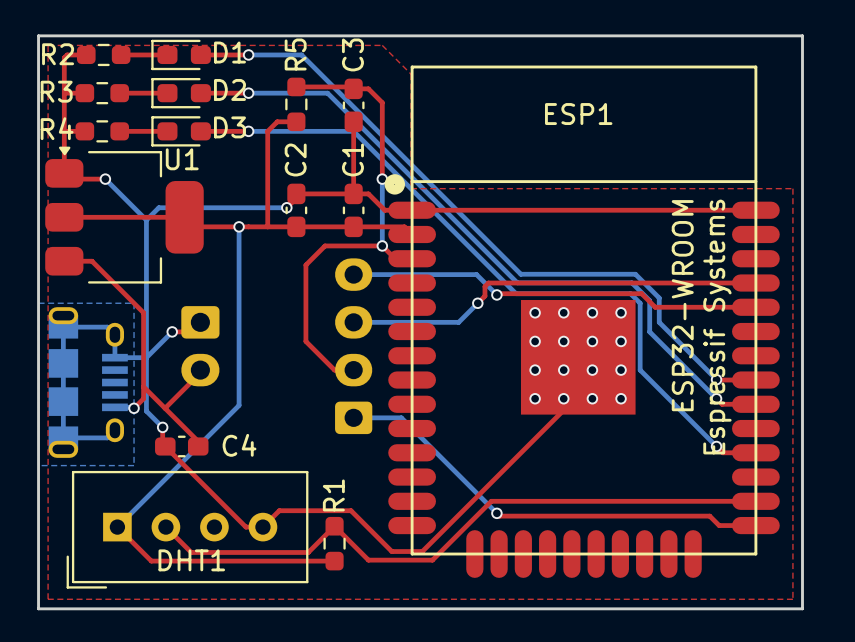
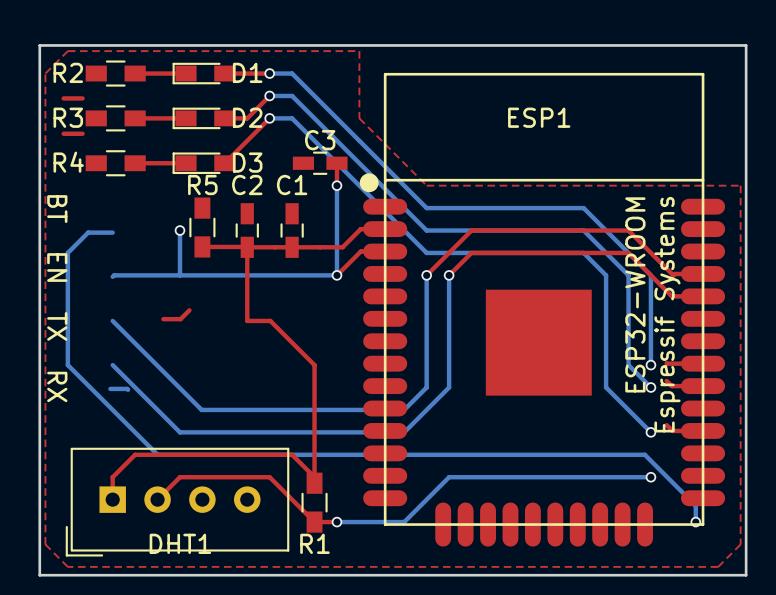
D1 footprint: [151, 39, 211, 71] -> [172, 62, 236, 85]
R2 footprint: [76, 43, 131, 67] -> [85, 60, 146, 87]
top zone outline: (48, 45) (48, 599) (792, 599) (792, 188) (410, 188) (410, 74) (382, 45) (48, 45) -> (67, 51) (45, 73) (45, 544) (67, 566) (718, 566) (740, 544) (740, 185) (426, 185) (359, 118) (359, 51) (67, 51)
top track: (86, 54) (67, 54) (64, 57) (64, 173) (70, 179) (105, 179) -> none
top track: (121, 54) (167, 54) -> none
top track: (200, 54) (248, 54) -> none
bottom track: (248, 54) (301, 54) (520, 274) (635, 274) (659, 298) (659, 322) (716, 379) -> none
via: (248, 54) -> none
top track: none -> (135, 73) (185, 73)
top track: none -> (224, 73) (269, 73)
bottom track: none -> (269, 73) (292, 73) (426, 208) (583, 208) (650, 275) (650, 365)
via: none -> (269, 73)
D2 footprint: [151, 77, 211, 109] -> [172, 107, 236, 130]
R5 footprint: [285, 77, 308, 132] -> [189, 197, 216, 258]
C3 footprint: [342, 78, 365, 133] -> [292, 151, 348, 175]
R3 footprint: [75, 82, 130, 105] -> [85, 105, 146, 132]
top track: (296, 86) (368, 88) (382, 102) (382, 179) -> none
top track: none -> (269, 95) (247, 118) (224, 118)
bottom track: none -> (269, 95) (292, 95) (426, 230) (583, 230) (628, 275) (628, 365) (650, 387)
via: none -> (269, 95)
top track: (119, 93) (167, 93) -> none
top track: (200, 93) (248, 93) -> none
bottom track: (248, 93) (327, 93) (517, 282) (631, 282) (649, 300) (649, 331) (716, 398) -> none
via: (248, 93) -> none
top track: none -> (135, 118) (185, 118)
top track: none -> (269, 118) (224, 163)
bottom track: none -> (269, 118) (292, 118) (426, 252) (583, 252) (606, 275) (606, 387) (650, 432)
via: none -> (269, 118)
D3 footprint: [151, 116, 211, 147] -> [172, 152, 236, 175]
R4 footprint: [75, 120, 130, 143] -> [85, 150, 146, 177]
top track: (296, 121) (277, 121) (267, 131) (267, 226) -> none
top track: (353, 121) (353, 193) -> none
top track: (119, 131) (167, 131) -> none
top track: (200, 131) (248, 131) -> none
bottom track: (248, 131) (353, 131) (516, 293) (630, 293) (640, 303) (640, 370) (716, 446) -> none
via: (248, 131) -> none
top track: none -> (135, 163) (185, 163)
top track: none -> (336, 163) (336, 185)
bottom track: (105, 179) (146, 220) -> none
via: (105, 179) -> none
bottom track: (382, 179) (382, 245) -> none
via position: (382, 179) -> (336, 185)
C2 footprint: [285, 183, 308, 238] -> [235, 203, 259, 258]
C1 footprint: [342, 183, 365, 238] -> [280, 203, 304, 258]
bottom track: none -> (336, 185) (336, 275) (112, 276)
top track: (286, 207) (296, 198) (296, 193) (368, 193) (384, 210) (755, 210) -> none
bottom track: (286, 207) (158, 207) (146, 220) -> none
via: (286, 207) -> none
U1: (124, 215) -> none
top track: (64, 217) (184, 217) (194, 226) (404, 226) (412, 234) -> (247, 247) (342, 247) (360, 229) (385, 229)
bottom track: (146, 220) (146, 411) (162, 427) -> none
bottom track: (239, 226) (239, 405) (117, 527) -> none
via: (239, 226) -> none
bottom track: none -> (179, 230) (179, 275)
via: none -> (179, 230)
bottom track: none -> (112, 232) (88, 232) (67, 252) (67, 365) (157, 454) (644, 454) (695, 505) (695, 522)
via: (382, 245) -> none
top track: none -> (202, 246) (247, 247)
top track: none -> (247, 247) (247, 320) (270, 320) (314, 365) (314, 483)
top track: (395, 258) (382, 245) (325, 245) (305, 265) (305, 341) (334, 370) (353, 370) -> (369, 251) (360, 251) (336, 275)
top track: (64, 261) (92, 261) (143, 312) (143, 398) (134, 408) -> none
bottom track: (353, 274) (476, 274) (496, 294) -> none
top track: (725, 283) (488, 283) (484, 286) (484, 296) (477, 303) -> (674, 273) (673, 275) (628, 230) (471, 230) (426, 275)
via: none -> (336, 275)
bottom track: none -> (426, 275) (426, 387) (404, 409) (201, 409) (112, 320)
via: none -> (426, 275)
bottom track: none -> (449, 275) (449, 387) (404, 432) (179, 432) (112, 365)
via: none -> (449, 275)
top track: (496, 294) (641, 293) (655, 307) (722, 307) -> (449, 275) (471, 252) (628, 252) (671, 296)
via: (496, 294) -> none
bottom zone outline: (38, 303) (134, 303) (134, 465) (38, 465) (38, 303) -> none
bottom track: (477, 303) (458, 322) (353, 322) -> none
via: (477, 303) -> none
text: none -> BT EN TX RX (57, 298)
via: (535, 312) -> none
via: (563, 312) -> none
via: (592, 312) -> none
via: (621, 312) -> none
top track: (622, 312) (578, 357) (578, 395) (422, 551) (391, 551) (351, 510) (279, 510) (262, 527) (245, 527) (162, 443) (162, 427) -> none
bottom track: (172, 331) (146, 357) (114, 357) (114, 334) (107, 327) (63, 327) (63, 437) (107, 437) (114, 430) -> none
via: (172, 331) -> none
via: (535, 341) -> none
via: (563, 341) -> none
via: (592, 341) -> none
via: (621, 341) -> none
part: (200, 346) -> none
part: (353, 346) -> none
top track: (200, 370) (200, 372) (165, 408) -> none
via: (535, 370) -> none
via: (563, 370) -> none
via: (592, 370) -> none
via: (621, 370) -> none
via: (716, 379) -> none
via: none -> (650, 365)
part: (88, 382) -> none
top track: (143, 386) (198, 441) (198, 446) -> none
via: (535, 398) -> none
via: (563, 398) -> none
via: (592, 398) -> none
via: (621, 398) -> none
via: (716, 398) -> none
via: none -> (650, 387)
via: (134, 408) -> none
bottom track: (353, 417) (401, 417) (496, 513) -> none
via: (162, 427) -> none
C4: (181, 446) -> none
via position: (716, 446) -> (650, 432)
R1 name position: R1 (333, 495) -> R1 (314, 543)
top track: (755, 501) (491, 501) (432, 560) (368, 560) (334, 526) (308, 552) (191, 552) (165, 527) -> (336, 522) (314, 522) (269, 477) (179, 477) (157, 499)
bottom track: none -> (650, 477) (449, 477) (404, 522) (336, 522)
via: none -> (650, 477)
top track: (496, 513) (499, 516) (709, 516) (719, 525) (755, 525) -> none
via: (496, 513) -> none
R1 footprint: [323, 516, 346, 571] -> [301, 472, 328, 533]
top track: (117, 527) (151, 561) (334, 561) -> (112, 499) (112, 477) (135, 454) (292, 454) (314, 477)
via: none -> (336, 522)
via: none -> (695, 522)
DHT1 name position: DHT1 (191, 560) -> DHT1 (180, 543)

